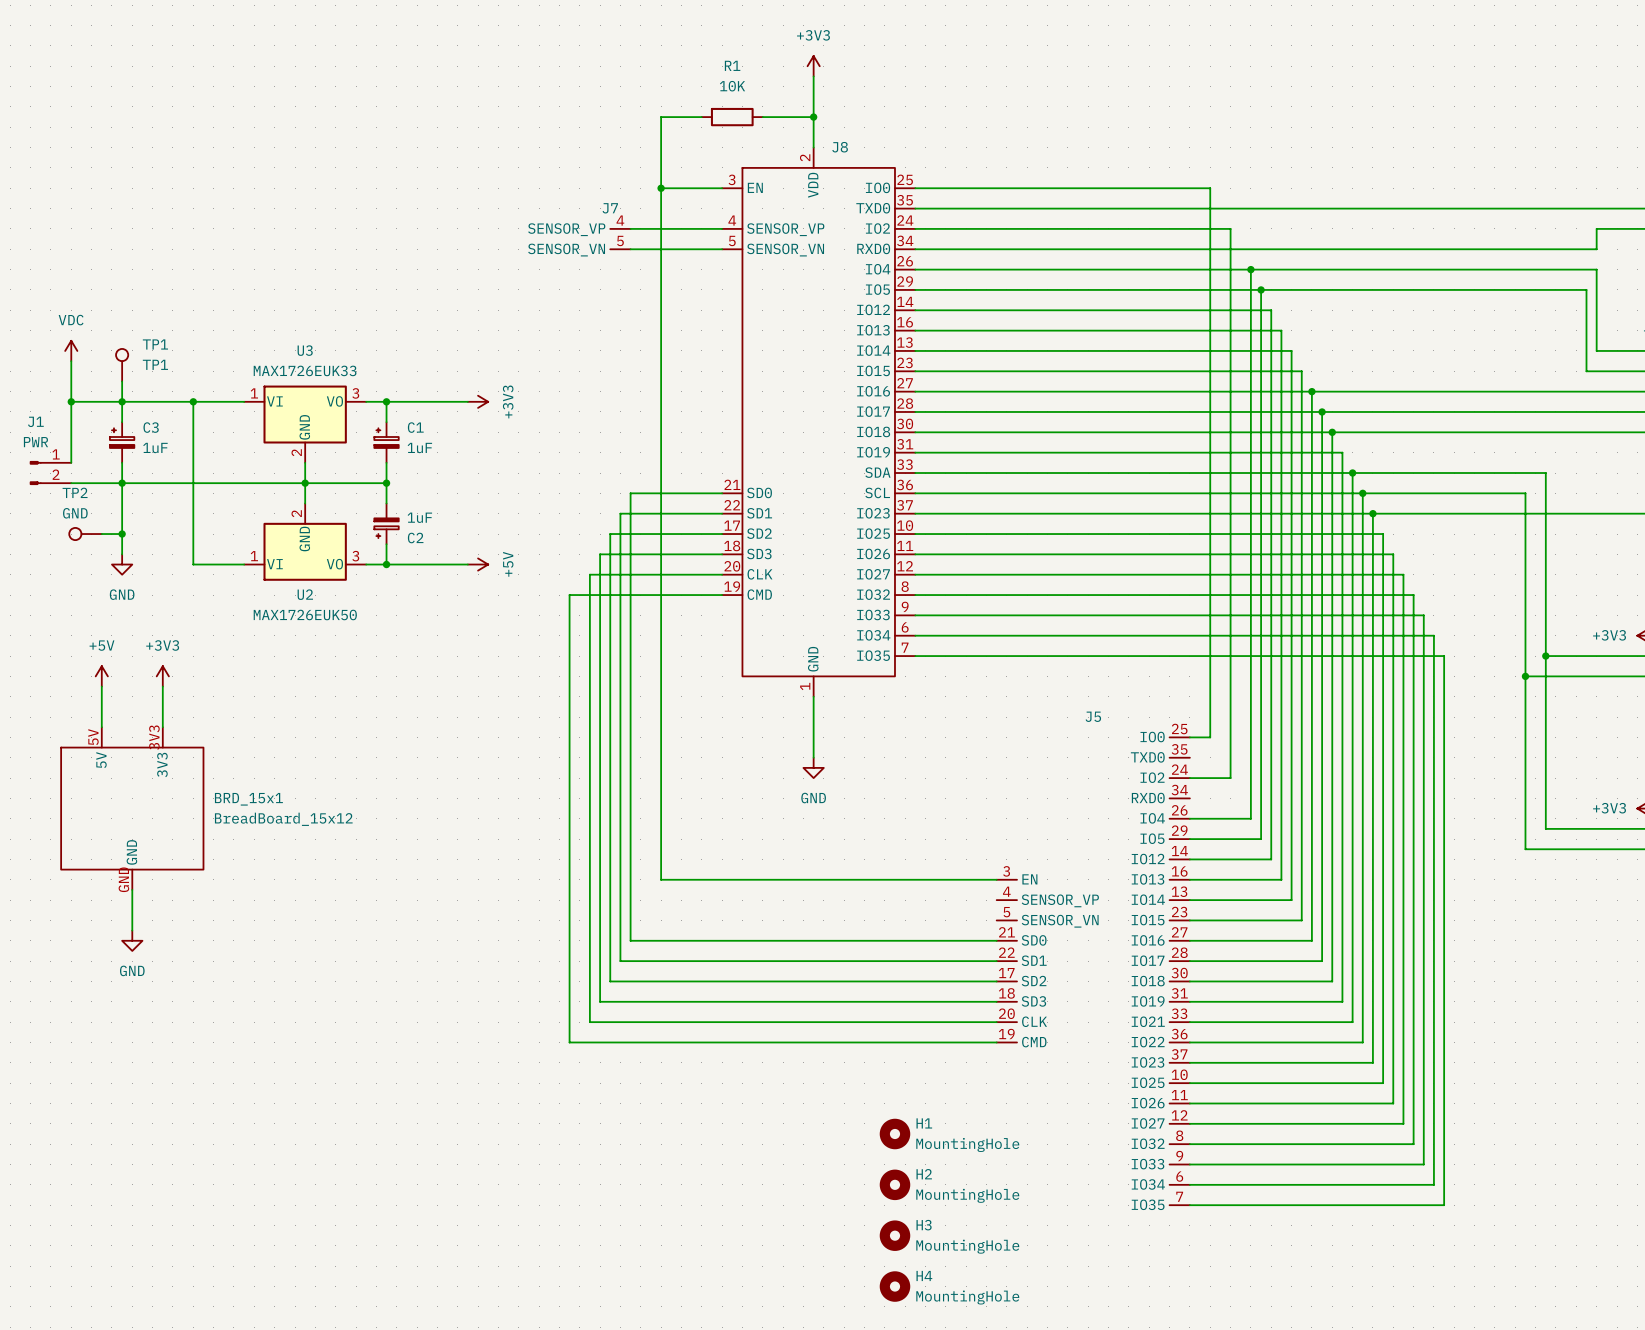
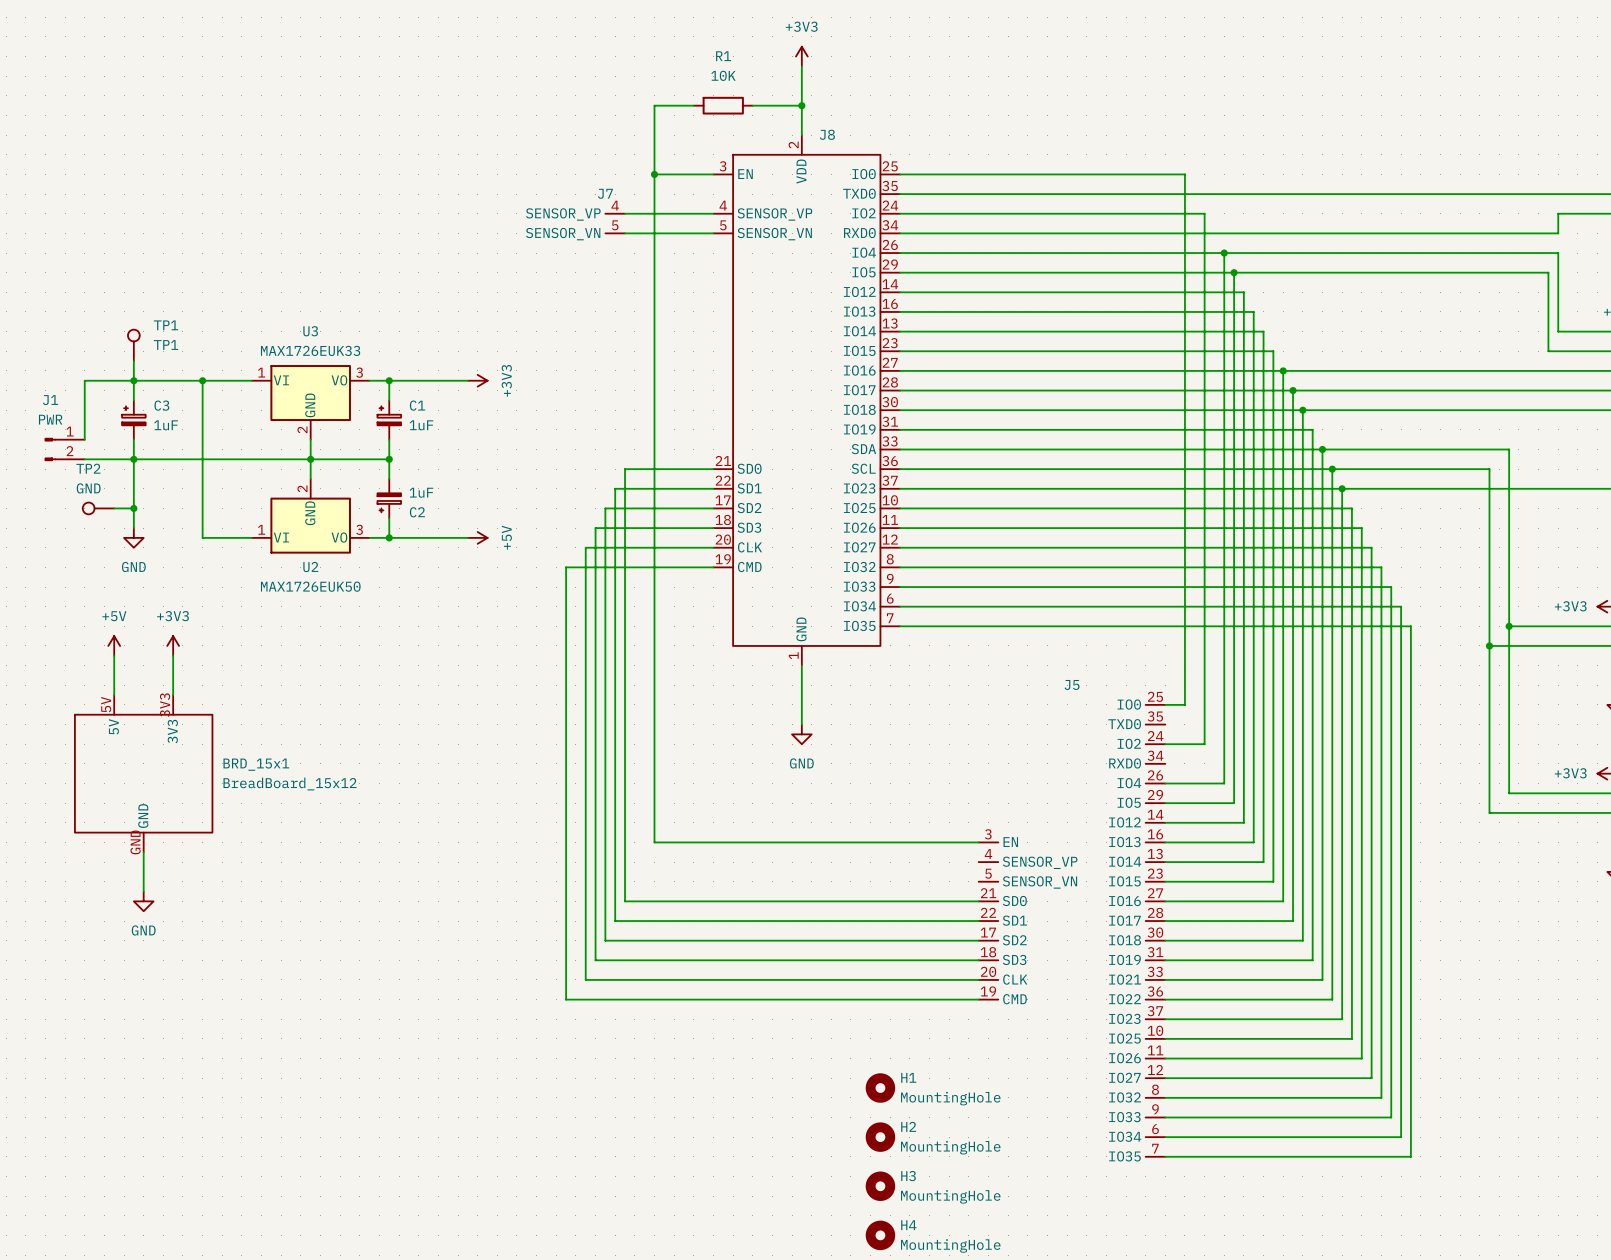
power symbol: VDC (71, 350) -> none
wire: (71, 361) (71, 401) -> none
junction: (71, 401) -> none

